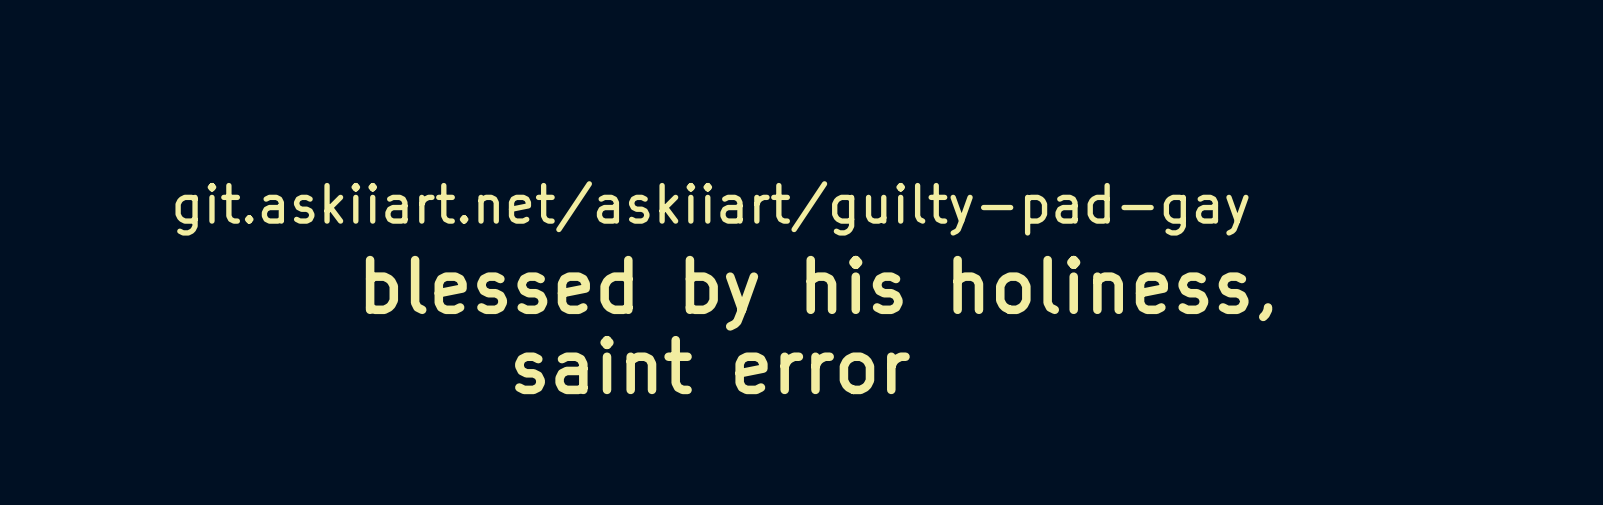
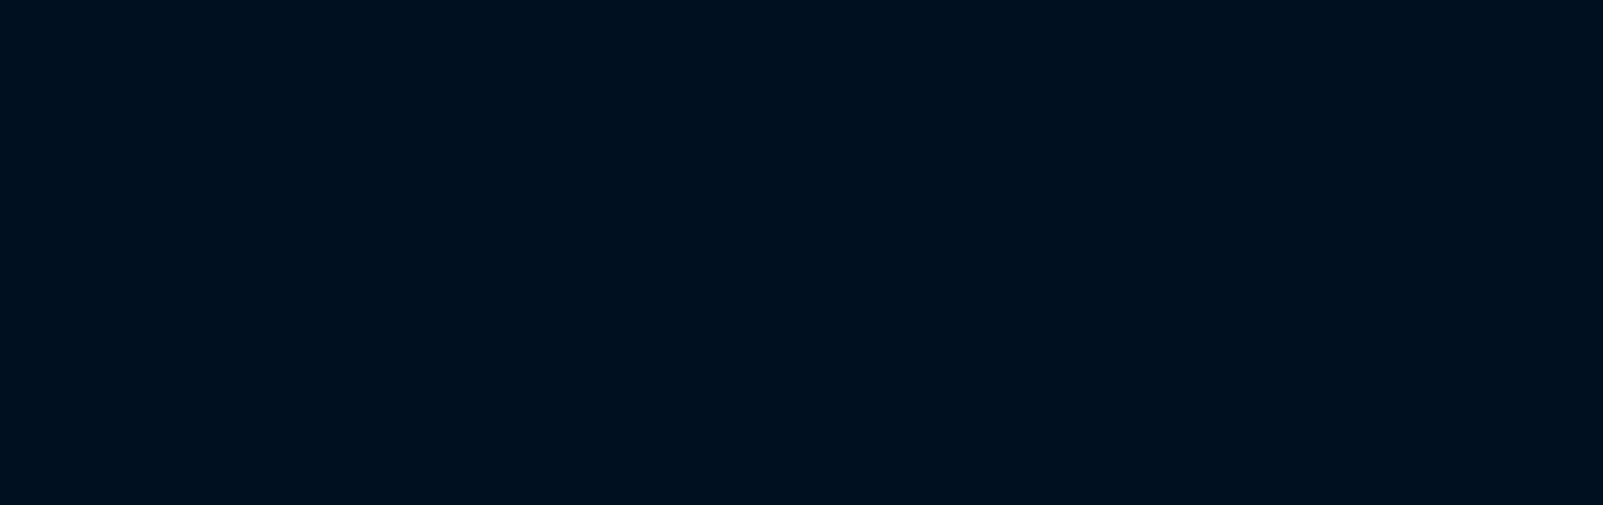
text: git.askiiart.net/askiiart/guilty-pad-gay (712, 208) -> none
text: blessed by his holiness, (819, 293) -> none
text: saint error (712, 365) -> none

